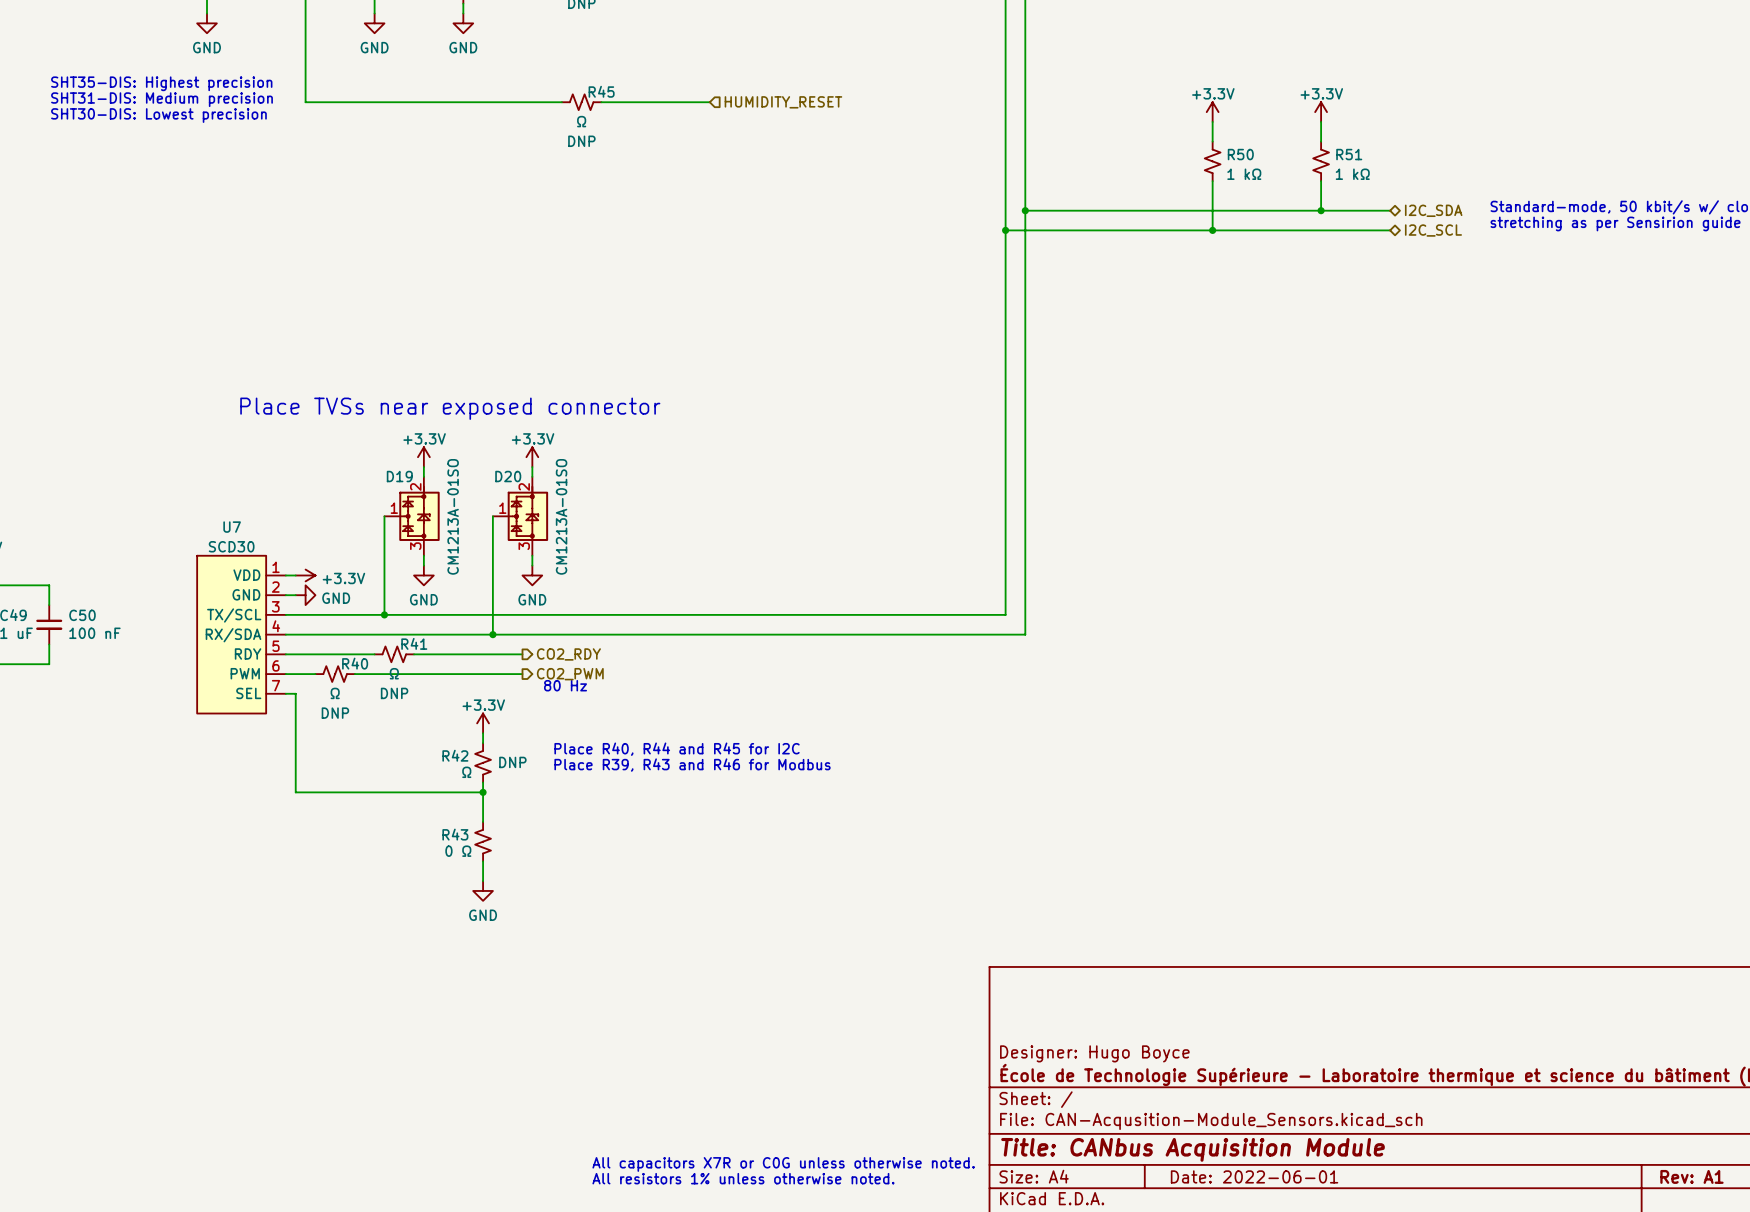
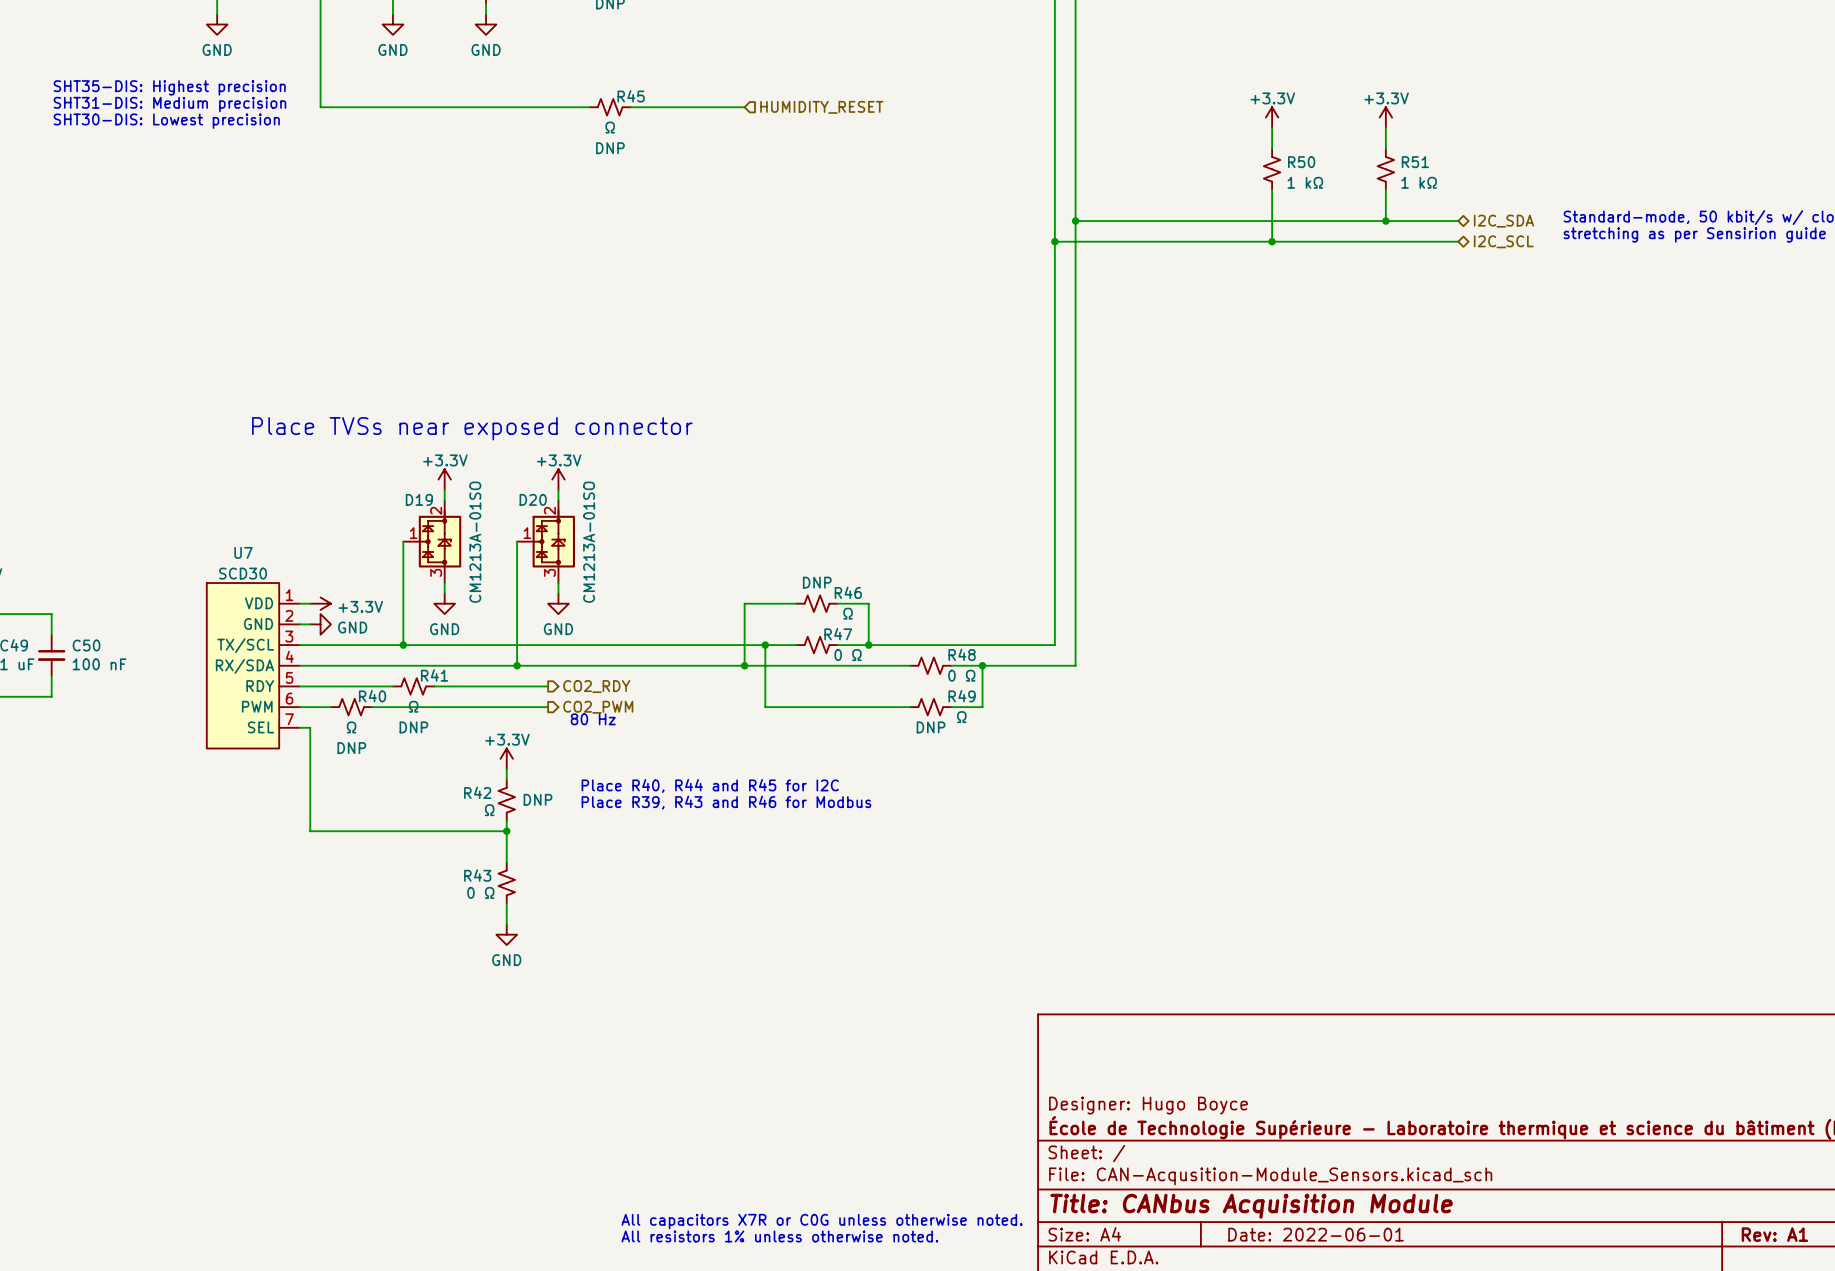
wire: none -> (796, 603) (744, 603) (744, 665)
R46: none -> Ω (817, 603)
wire: none -> (837, 603) (868, 603) (868, 645)
wire: none -> (765, 645) (765, 707) (910, 707)
junction: none -> (765, 645)
R47: none -> 0 Ω (817, 645)
junction: none -> (868, 645)
junction: none -> (744, 665)
R48: none -> 0 Ω (930, 665)
wire: none -> (982, 665) (982, 707) (951, 707)
junction: none -> (982, 665)
R49: none -> Ω (930, 707)

